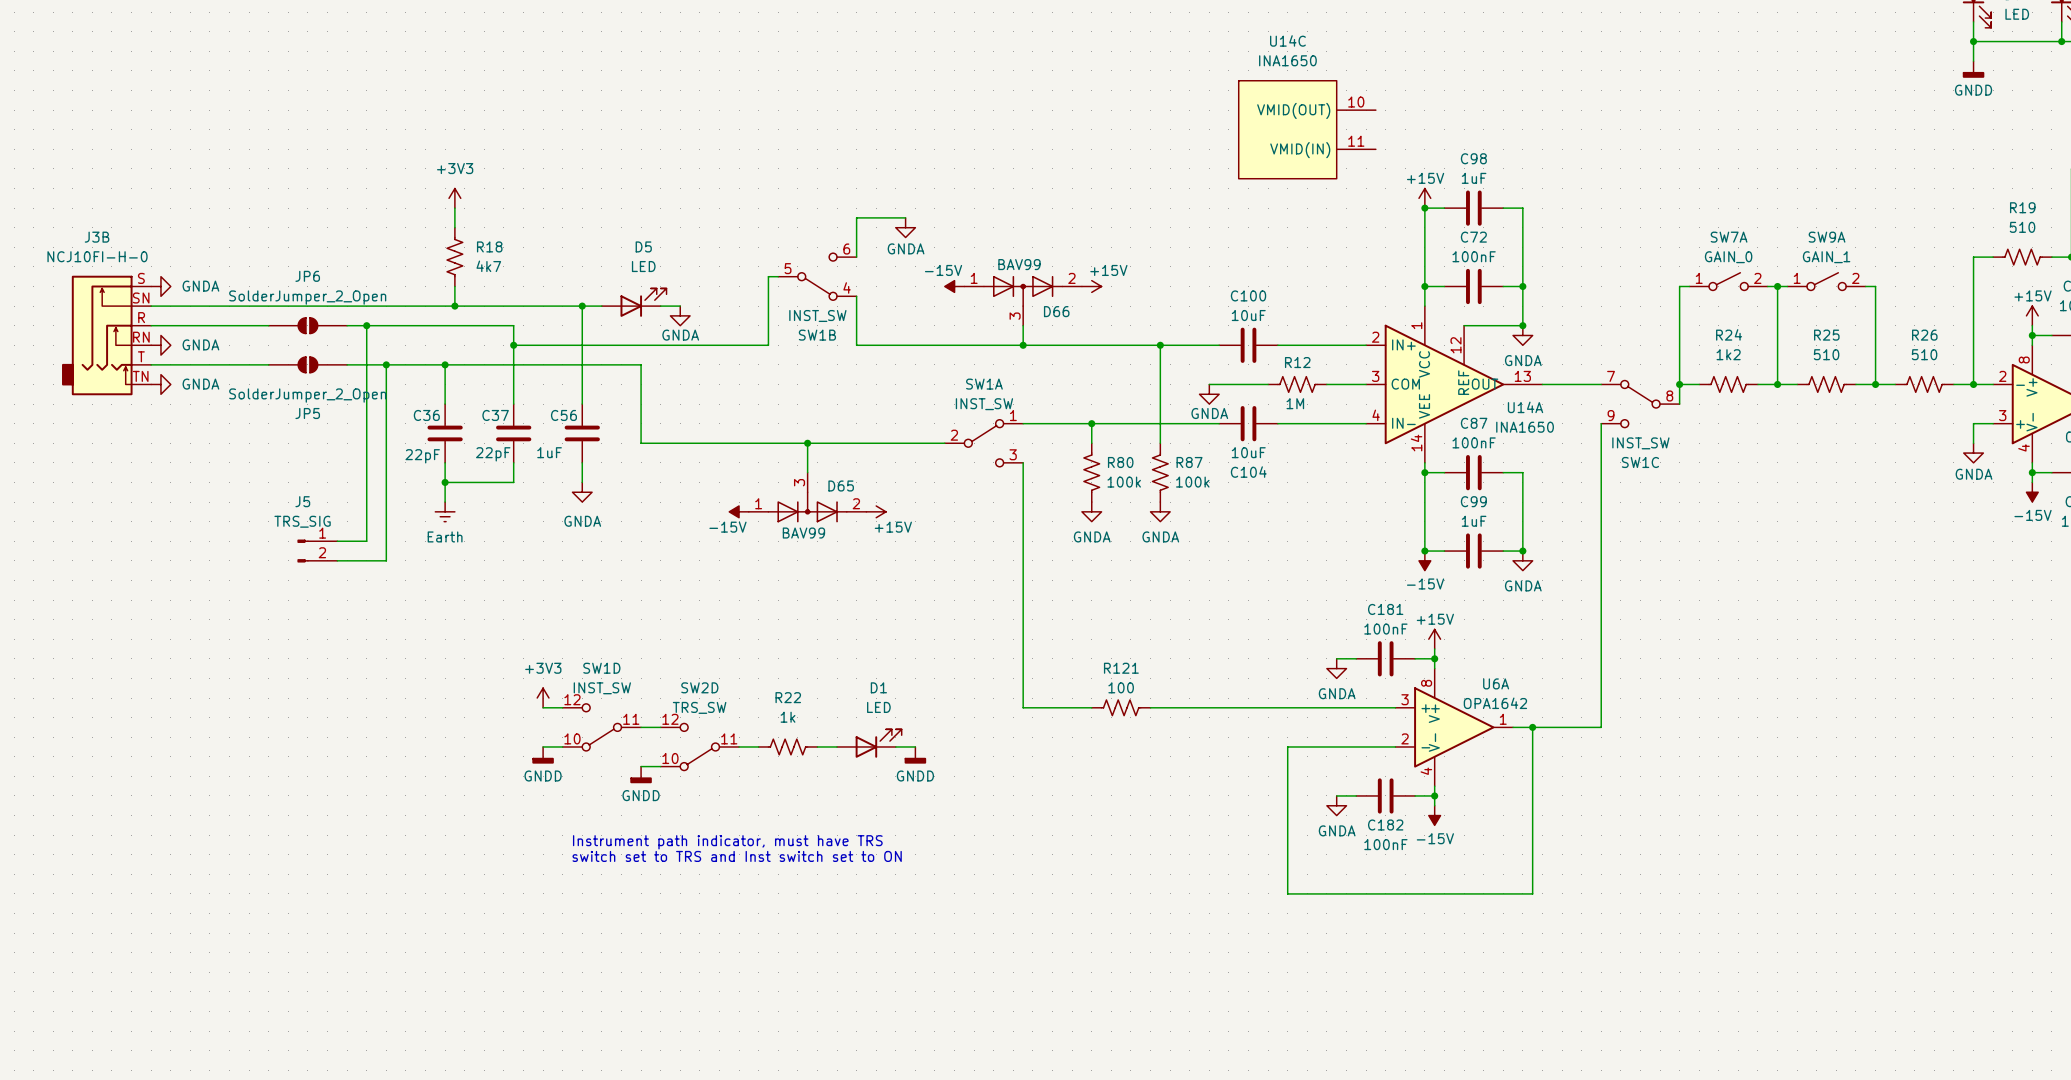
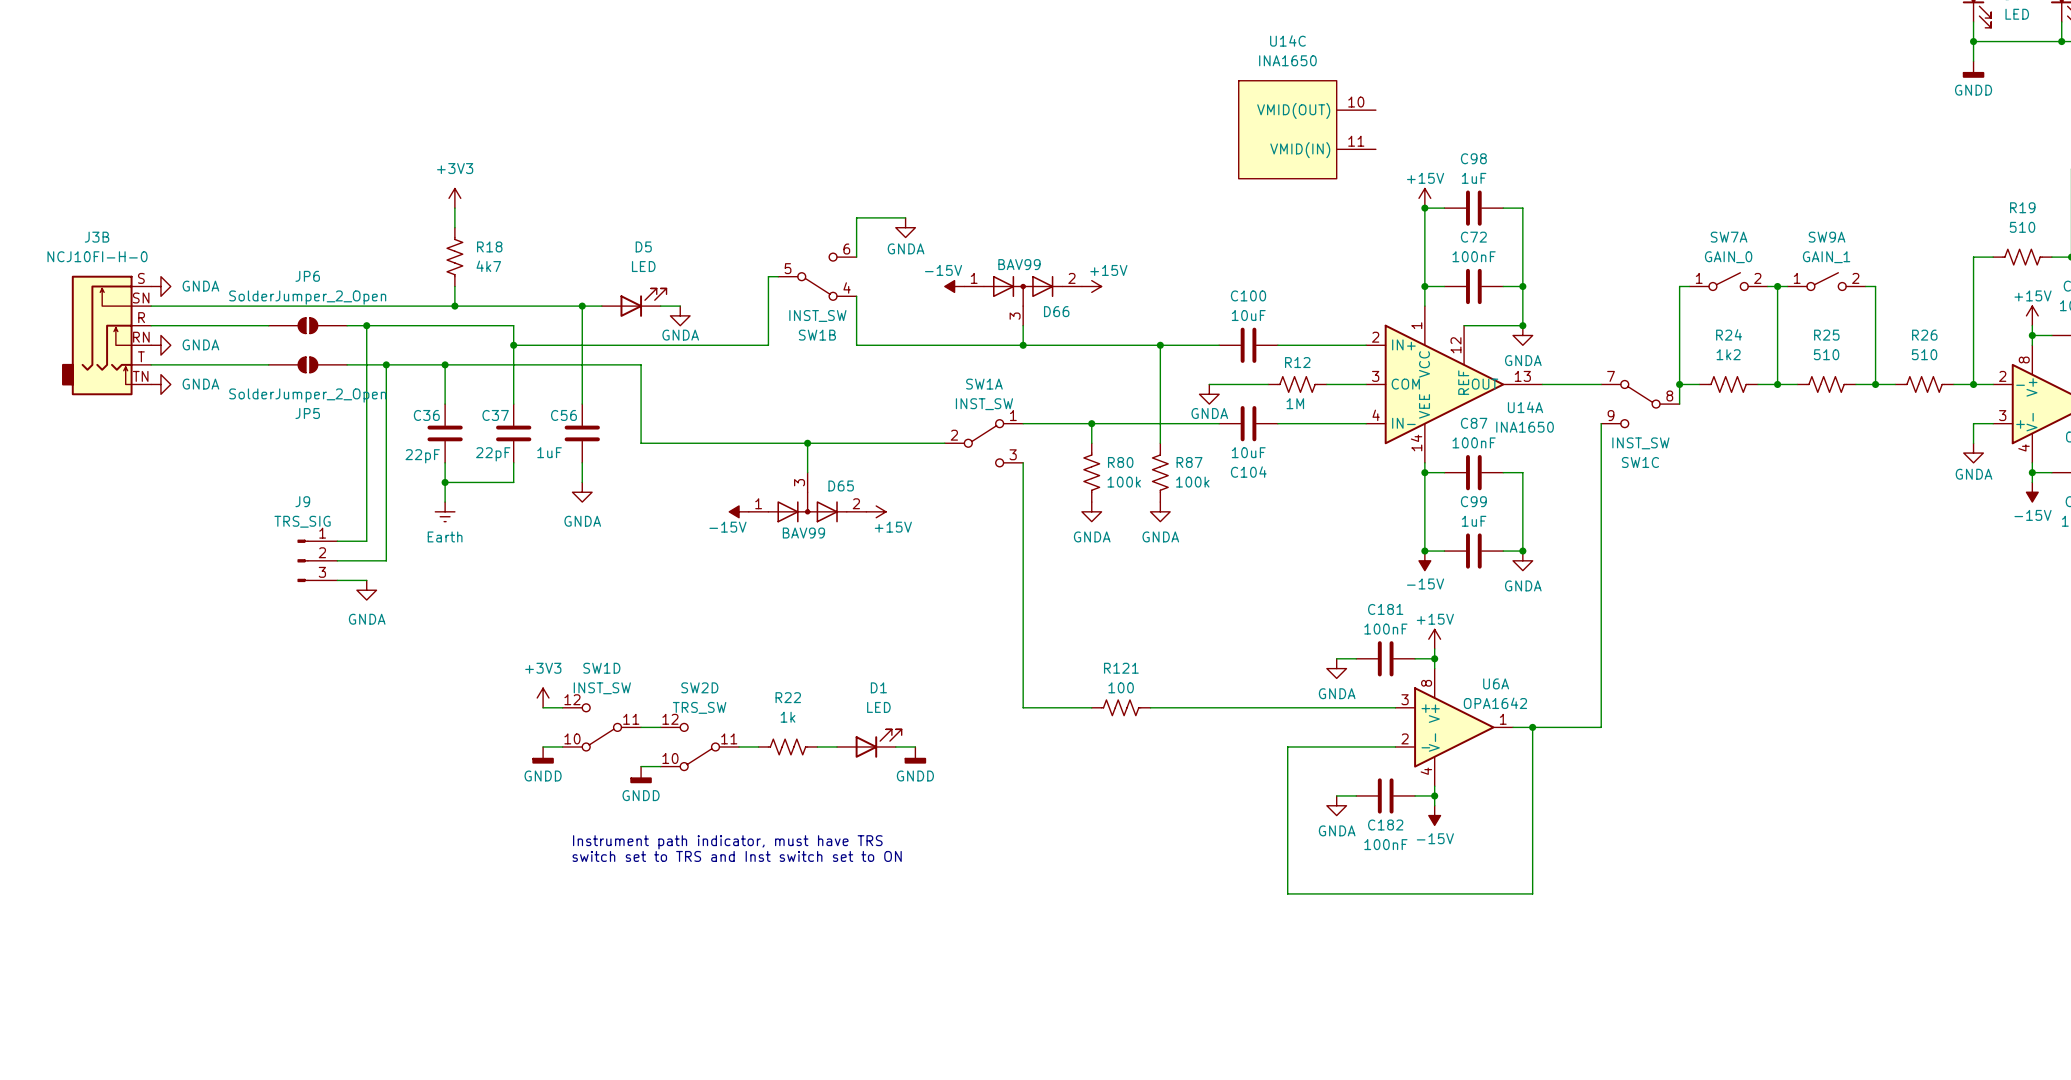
J5: TRS_SIG (317, 551) -> none
J9: none -> TRS_SIG (317, 560)
wire: none -> (337, 580) (366, 580)
power symbol: none -> GNDA (366, 590)

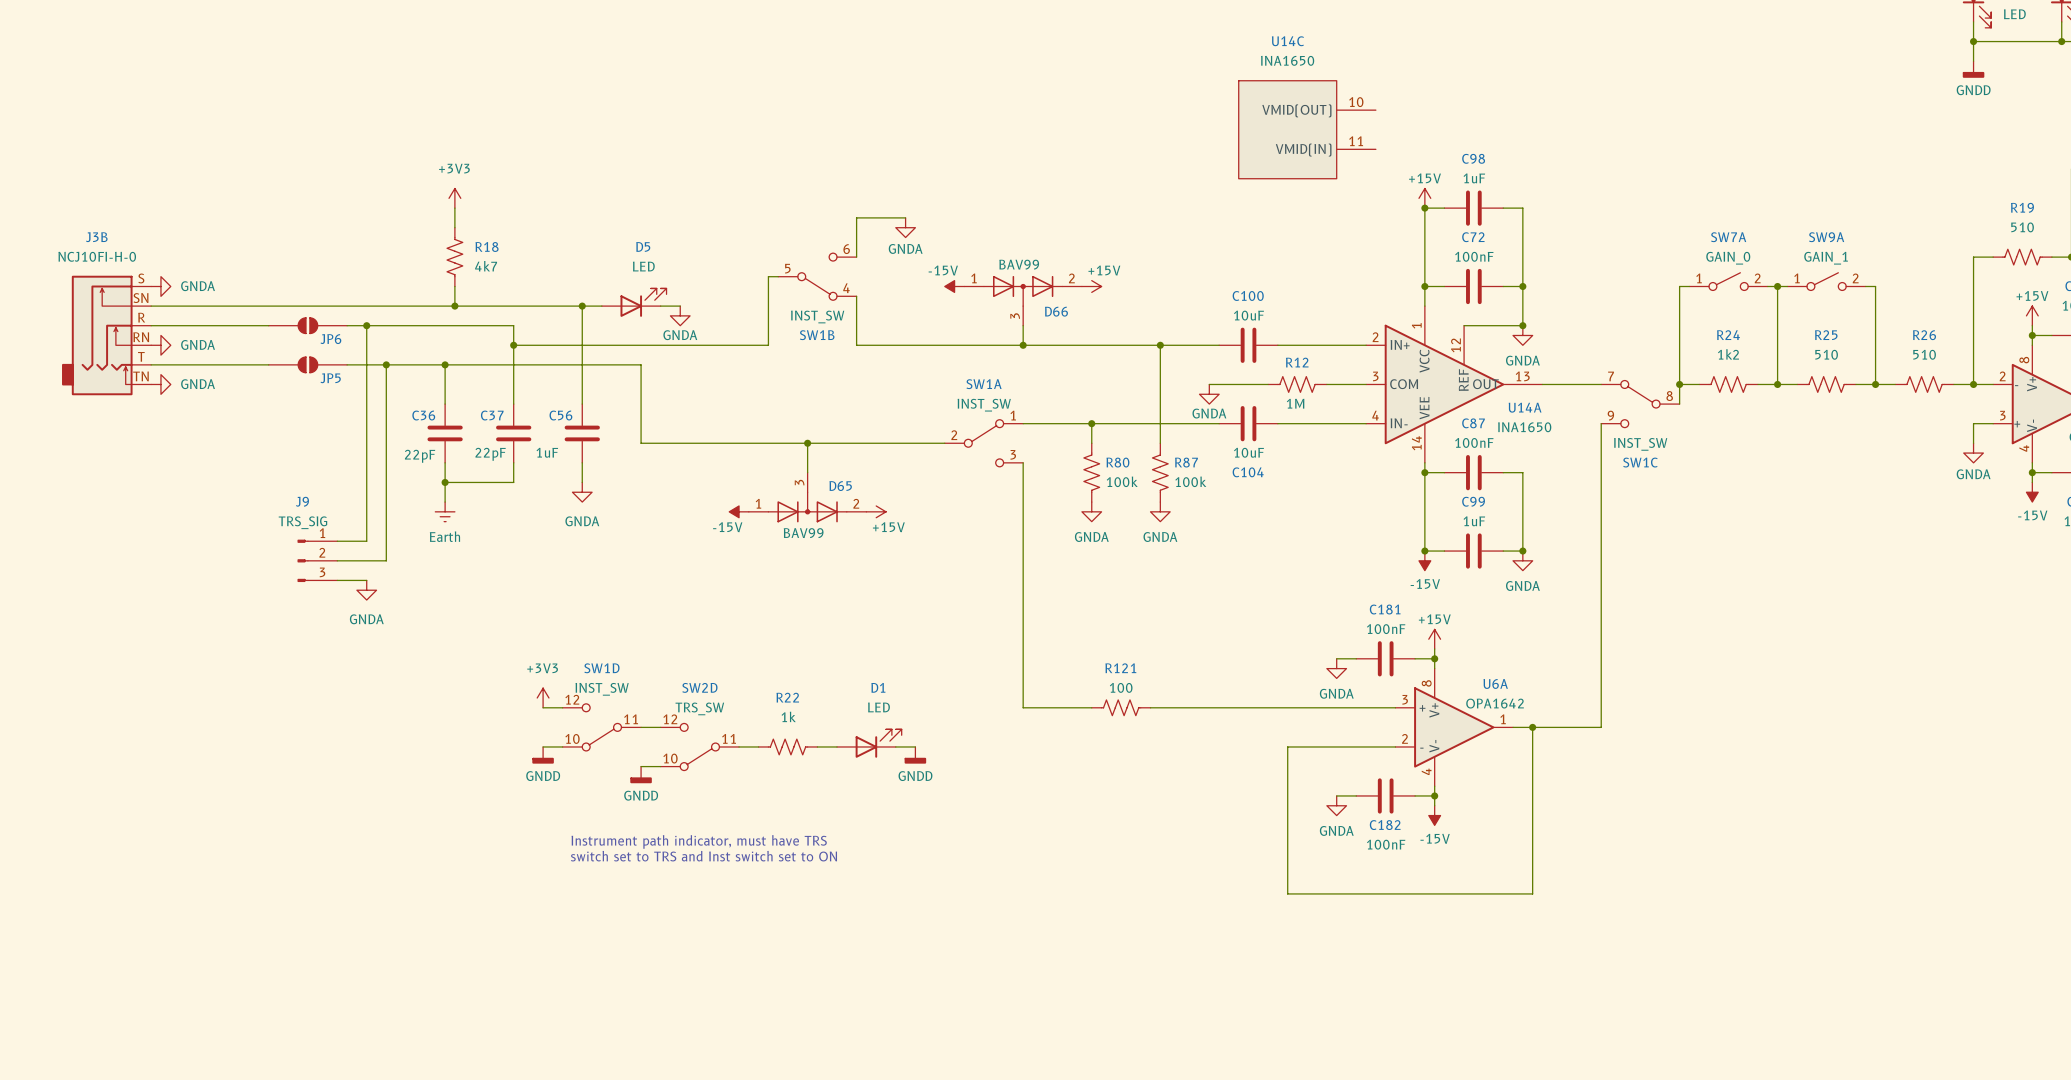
JP6 name position: JP6 (307, 276) -> JP6 (330, 339)
JP6 value: SolderJumper_2_Open (307, 297) -> none
JP5 value: SolderJumper_2_Open (307, 395) -> none
JP5 name position: JP5 (307, 413) -> JP5 (330, 378)

